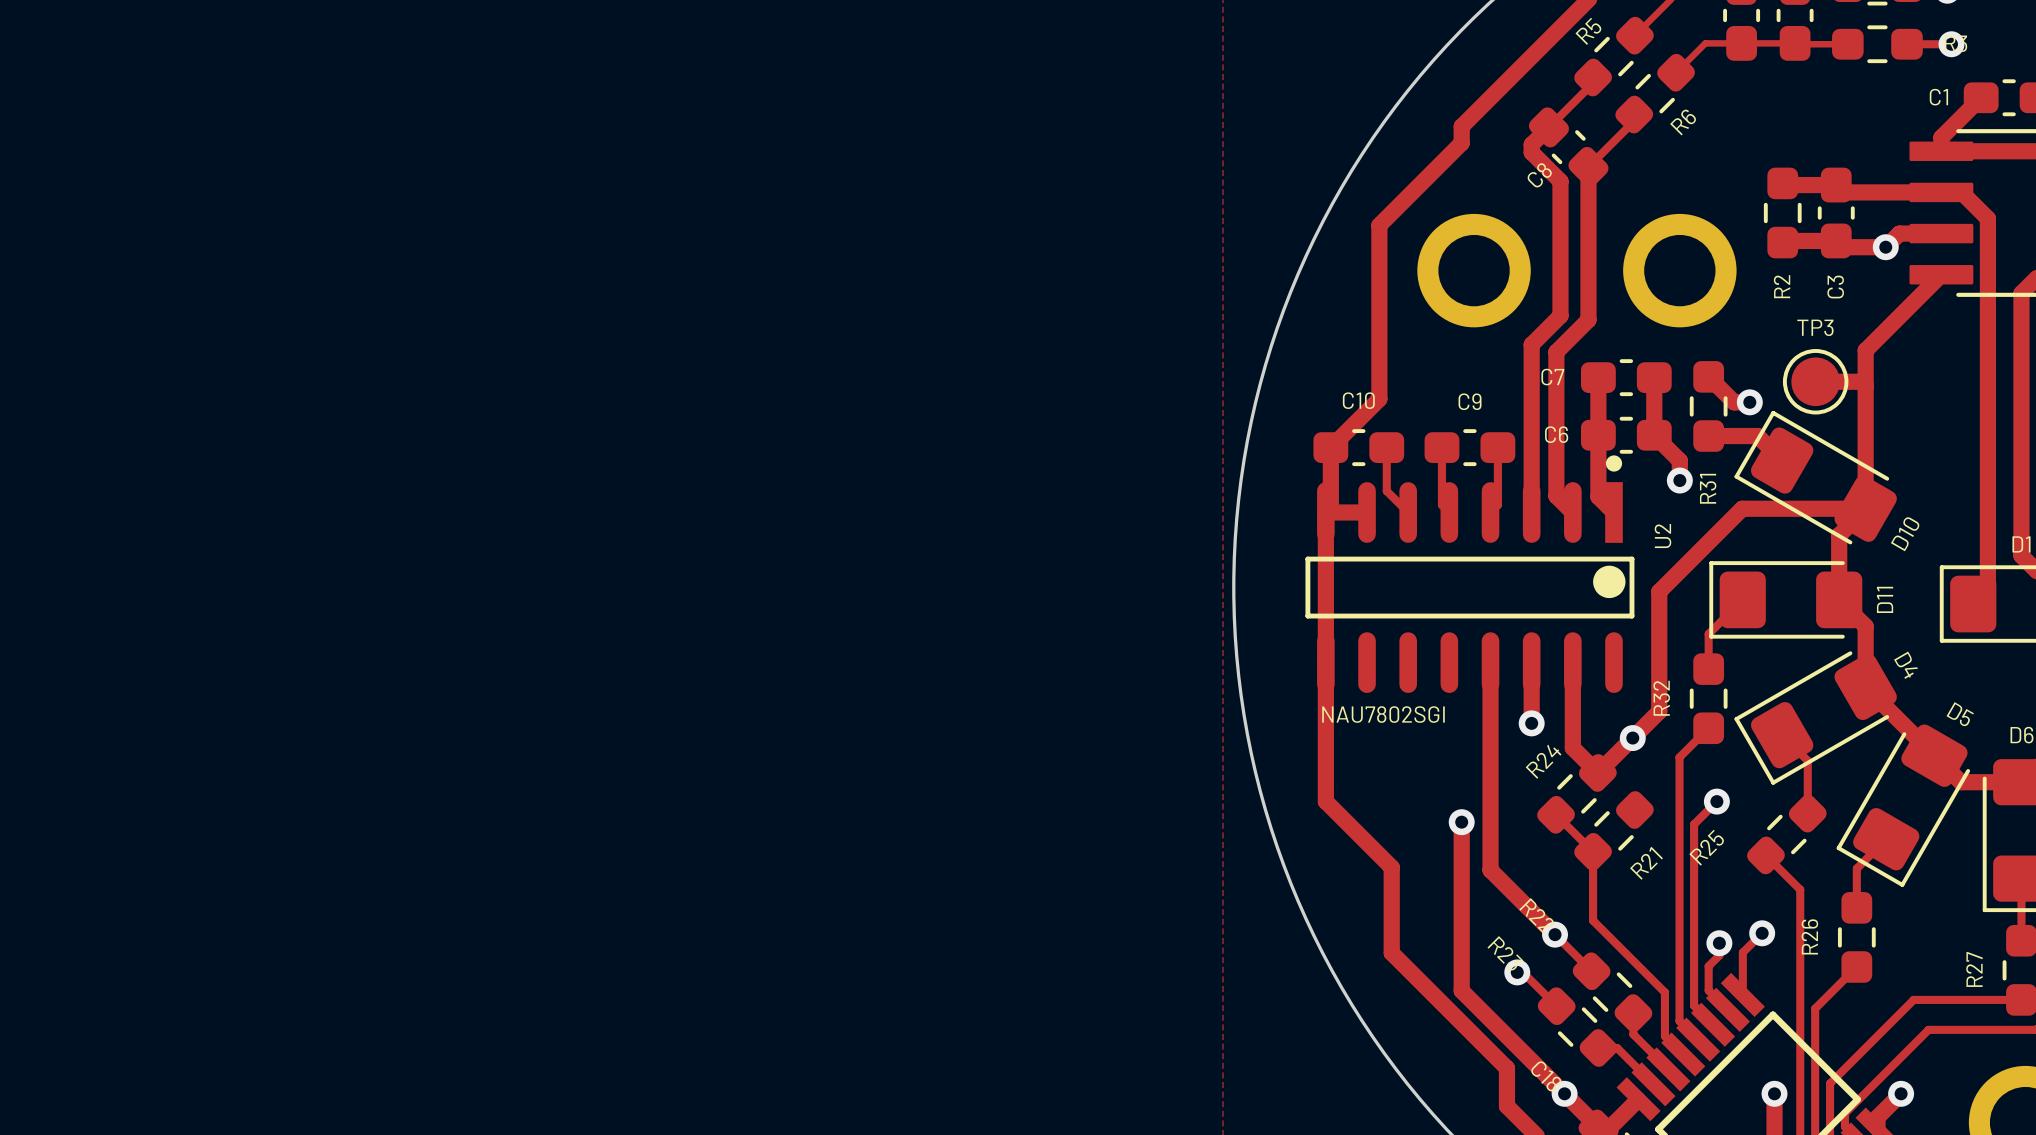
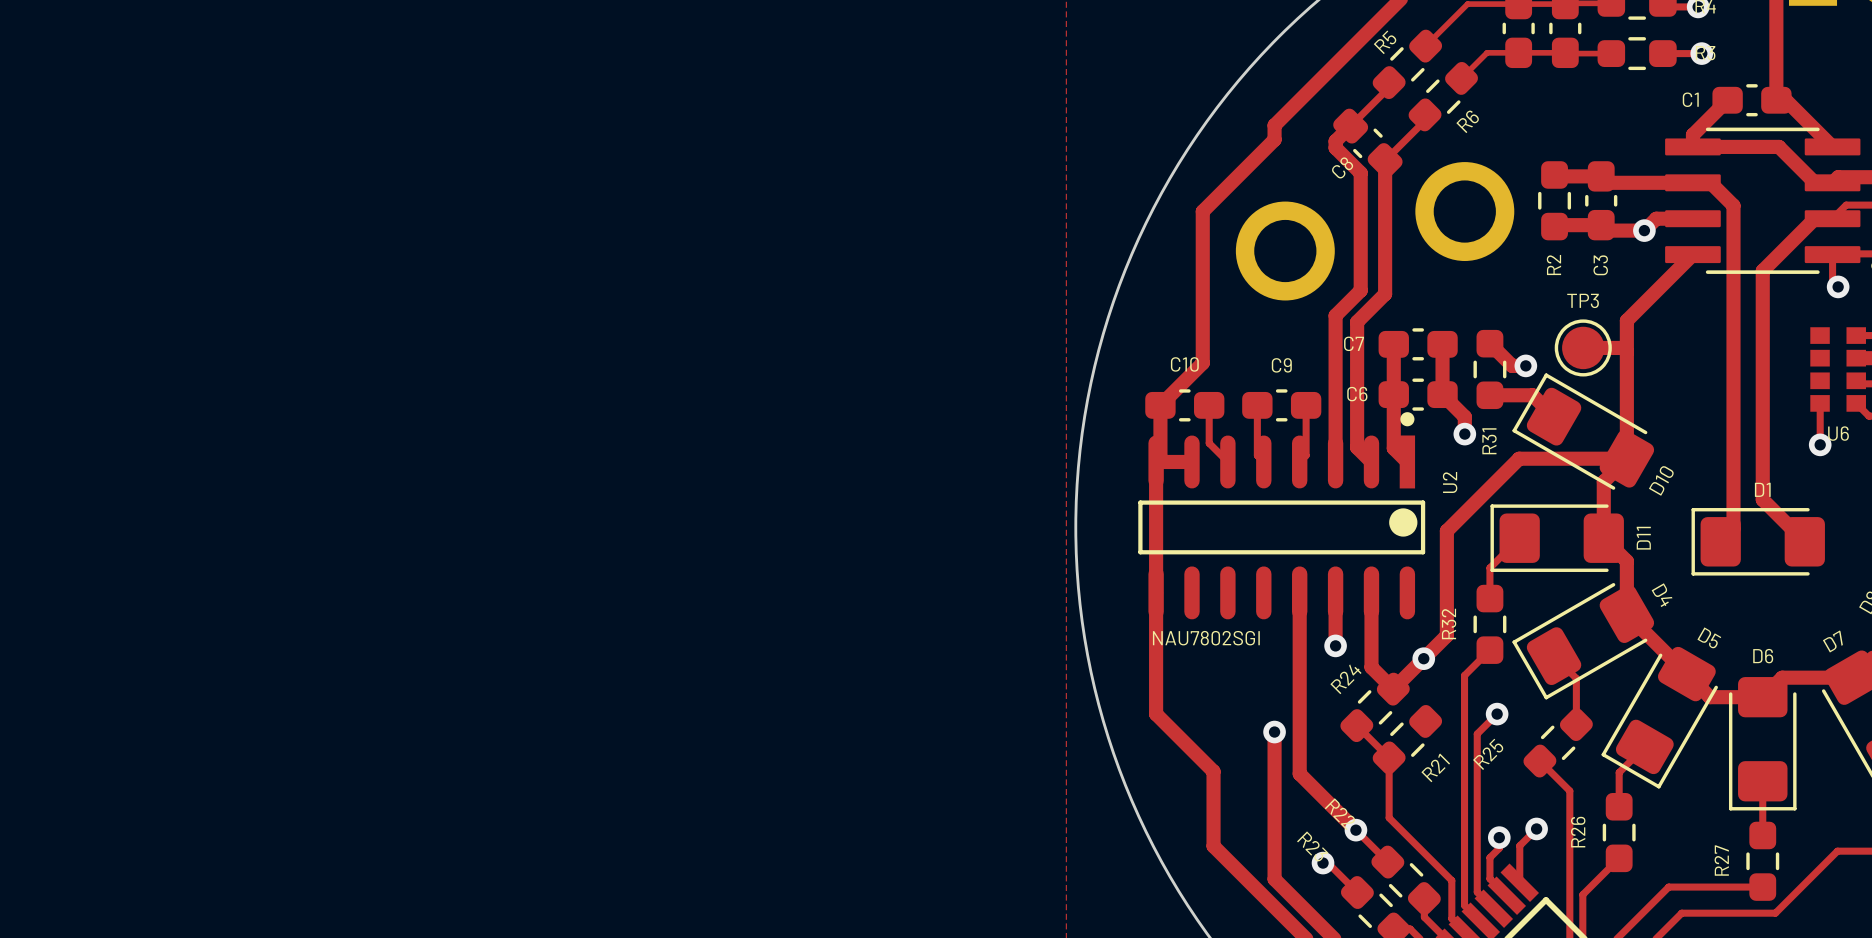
part position: (1679, 270) -> (1464, 211)

